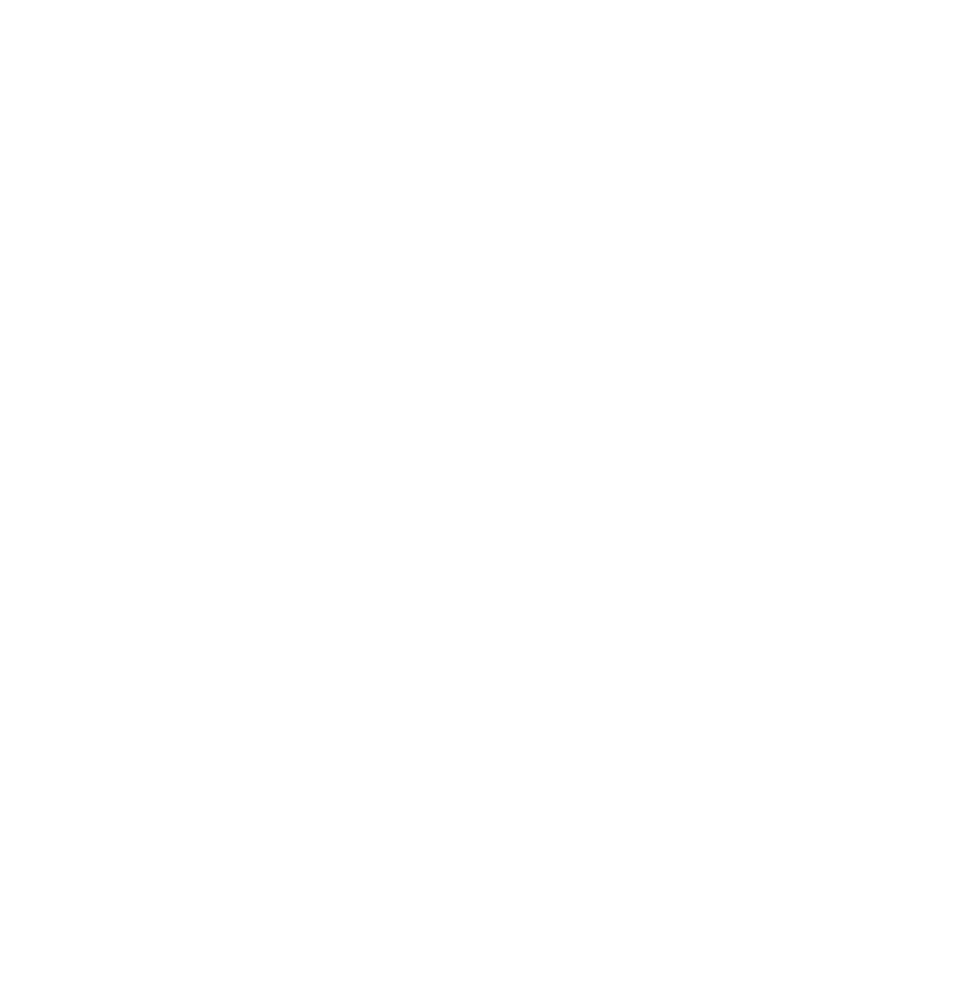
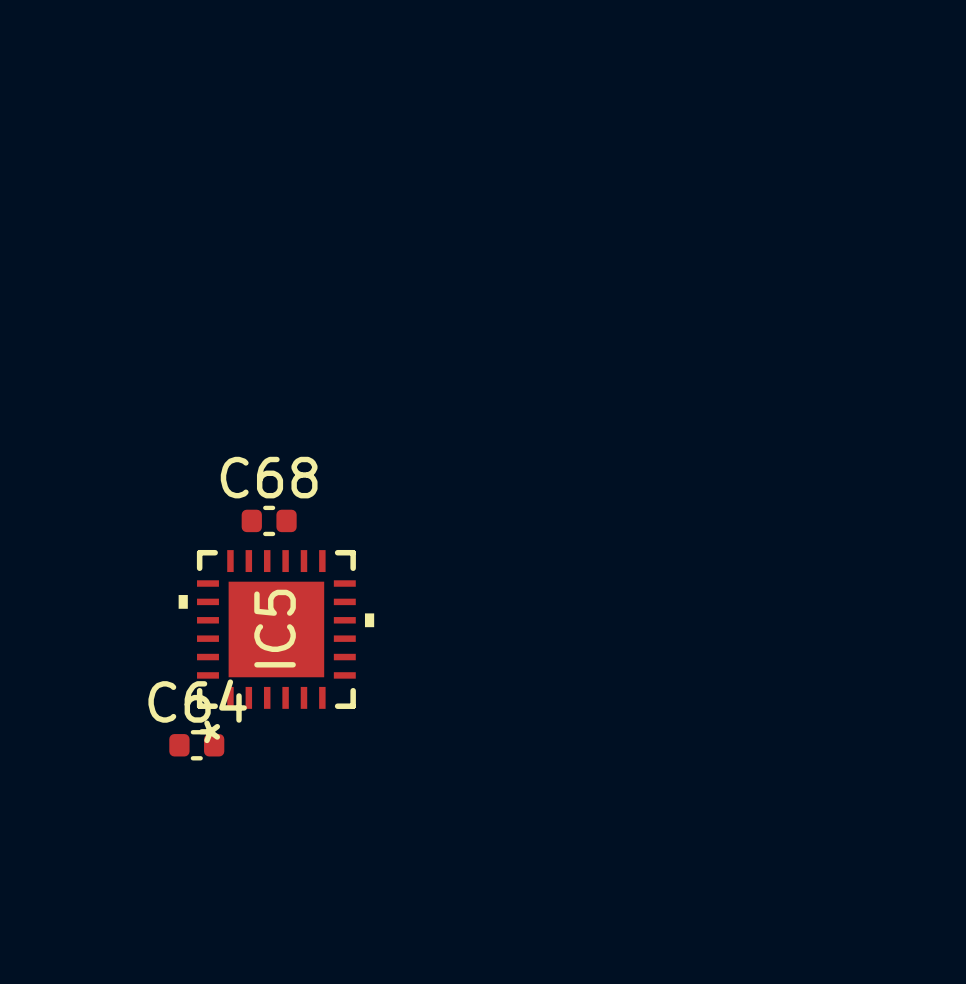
C68: none -> (269, 520)
IC5: none -> (276, 629)
C64: none -> (196, 745)

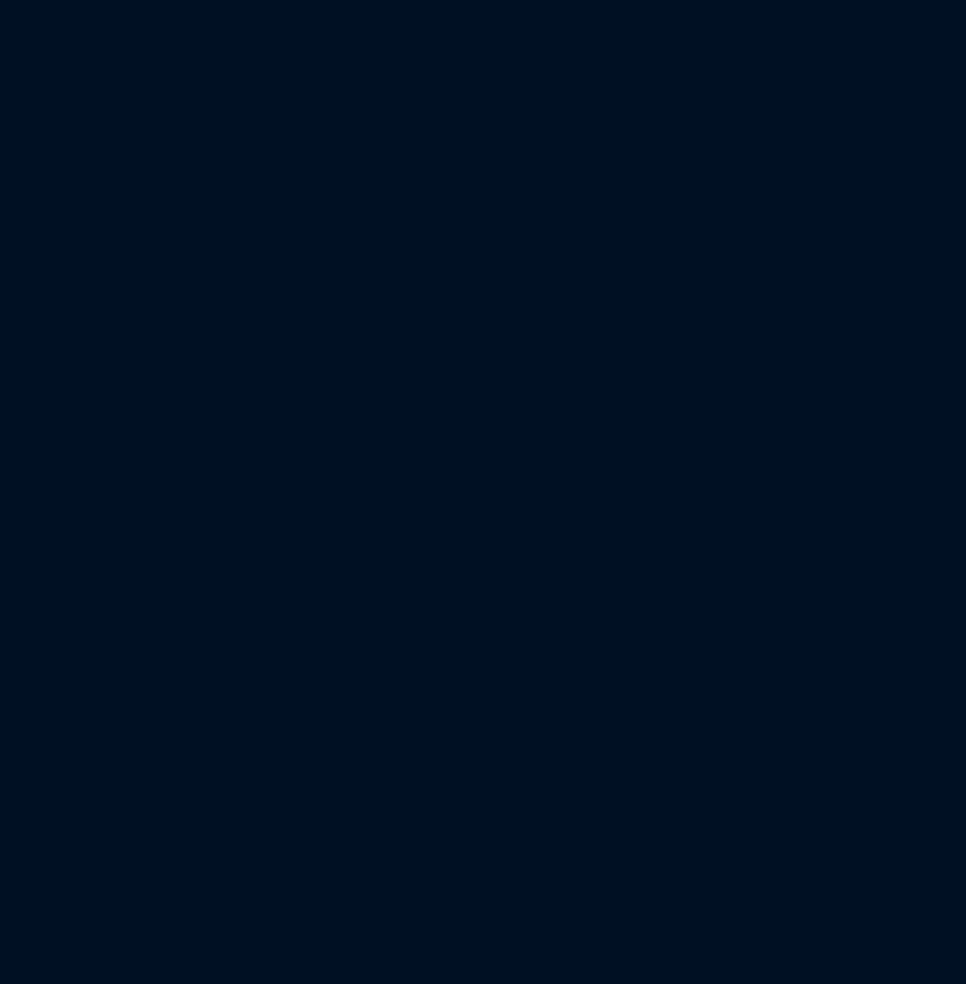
C68: (269, 520) -> none
IC5: (276, 629) -> none
C64: (196, 745) -> none

